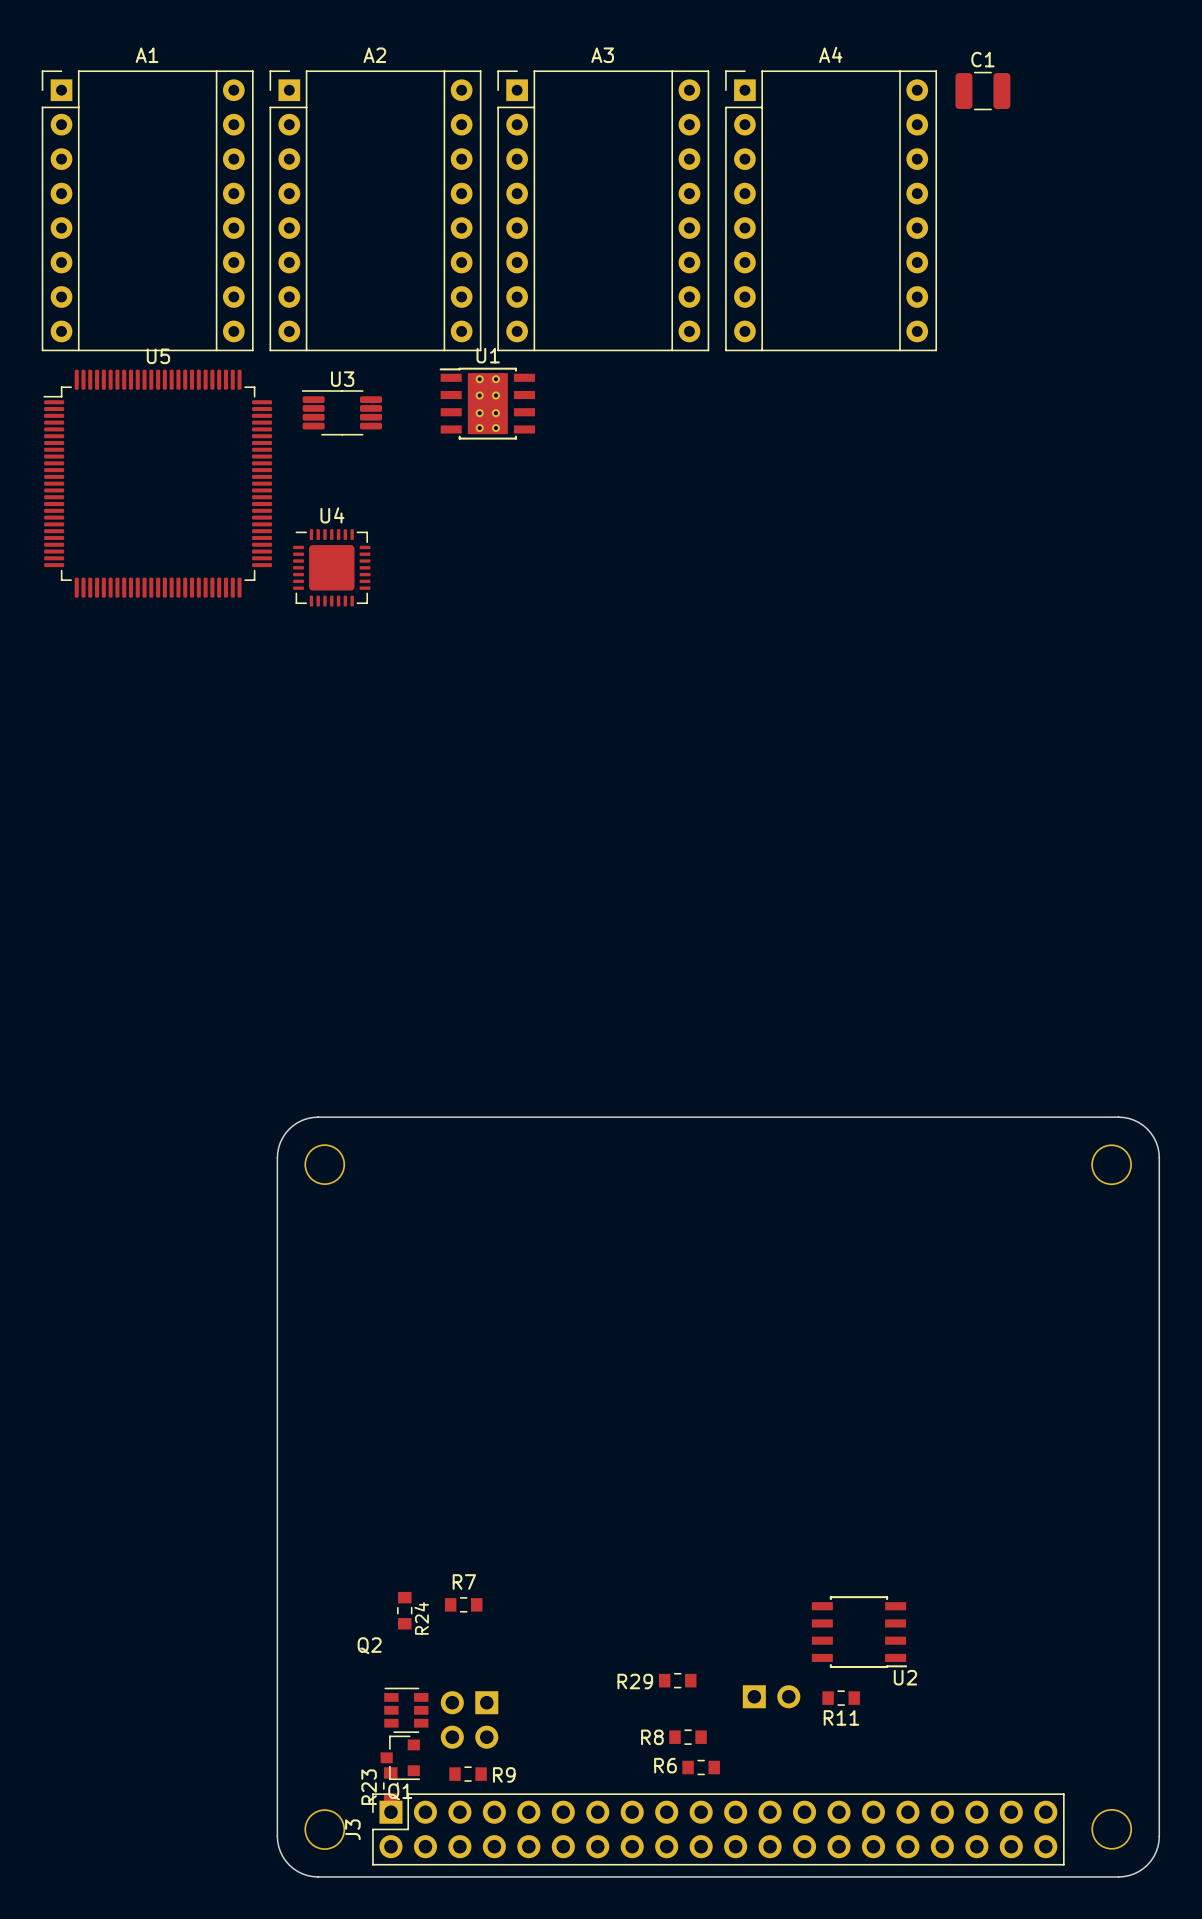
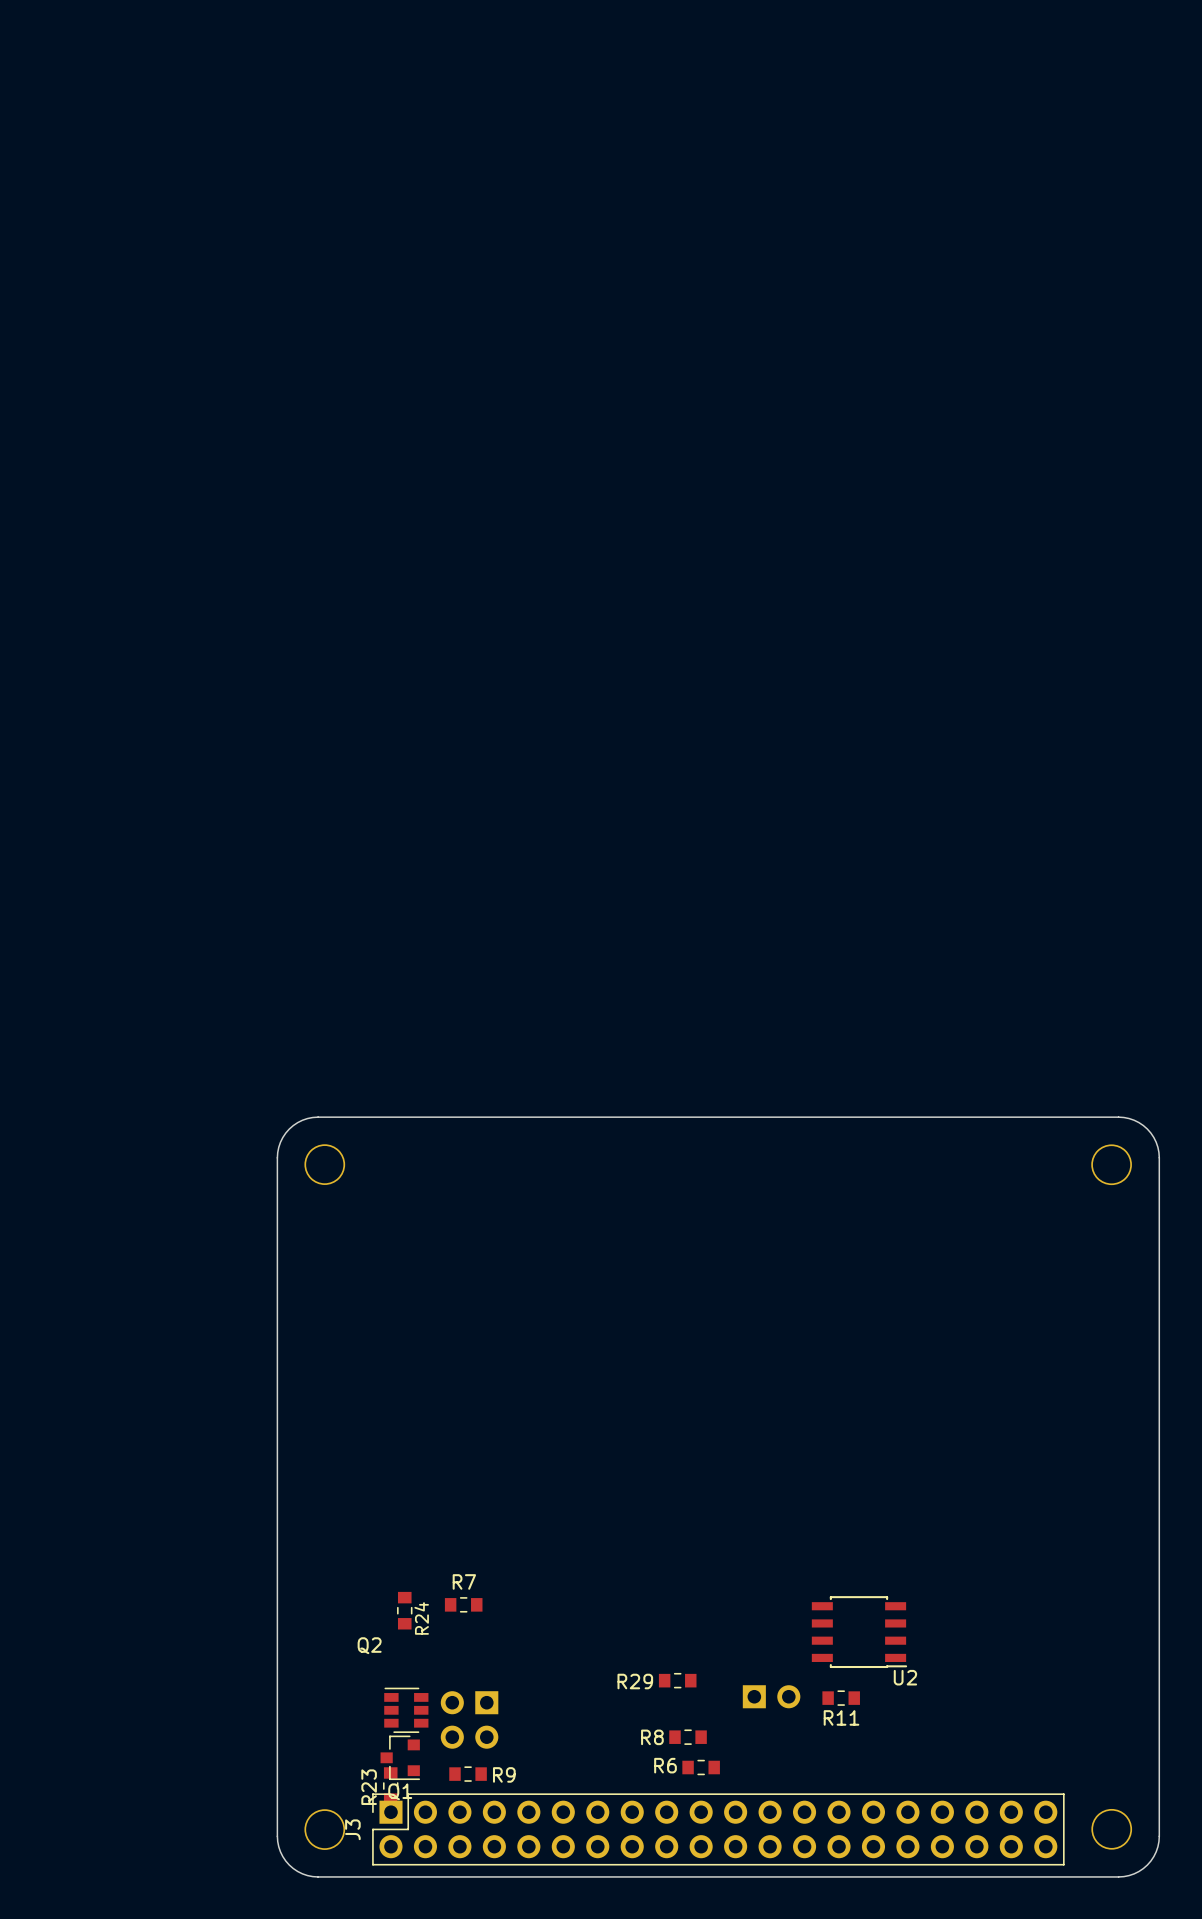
C1: (982, 91) -> none
A1: (147, 210) -> none
A2: (375, 210) -> none
A3: (603, 210) -> none
A4: (831, 210) -> none
U1: (487, 403) -> none
U3: (341, 412) -> none
U5: (157, 483) -> none
U4: (331, 567) -> none

